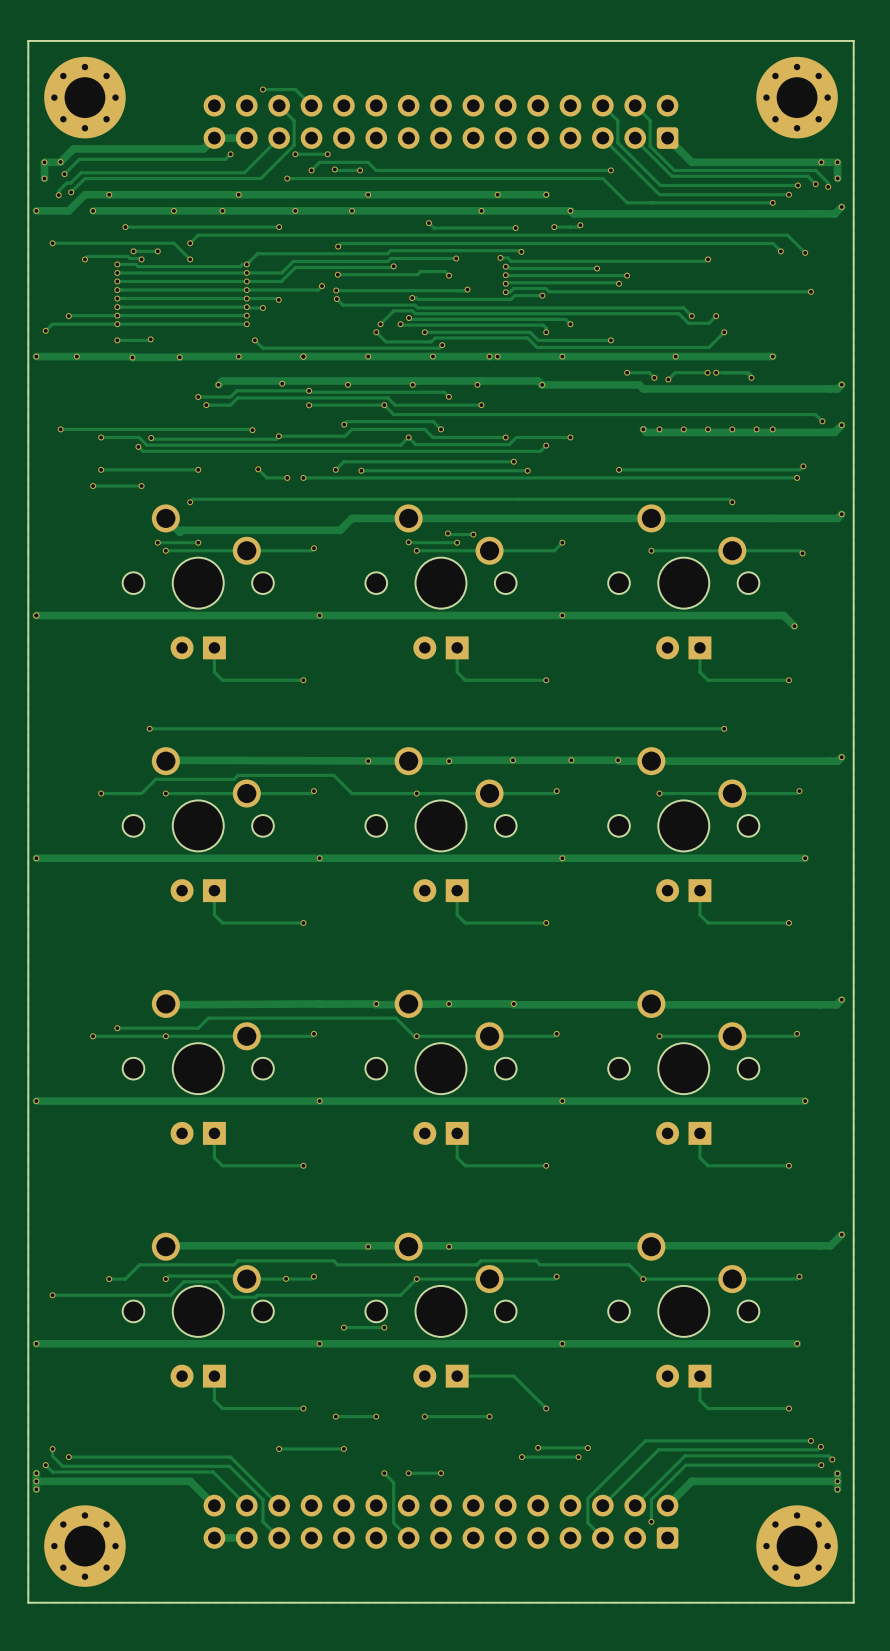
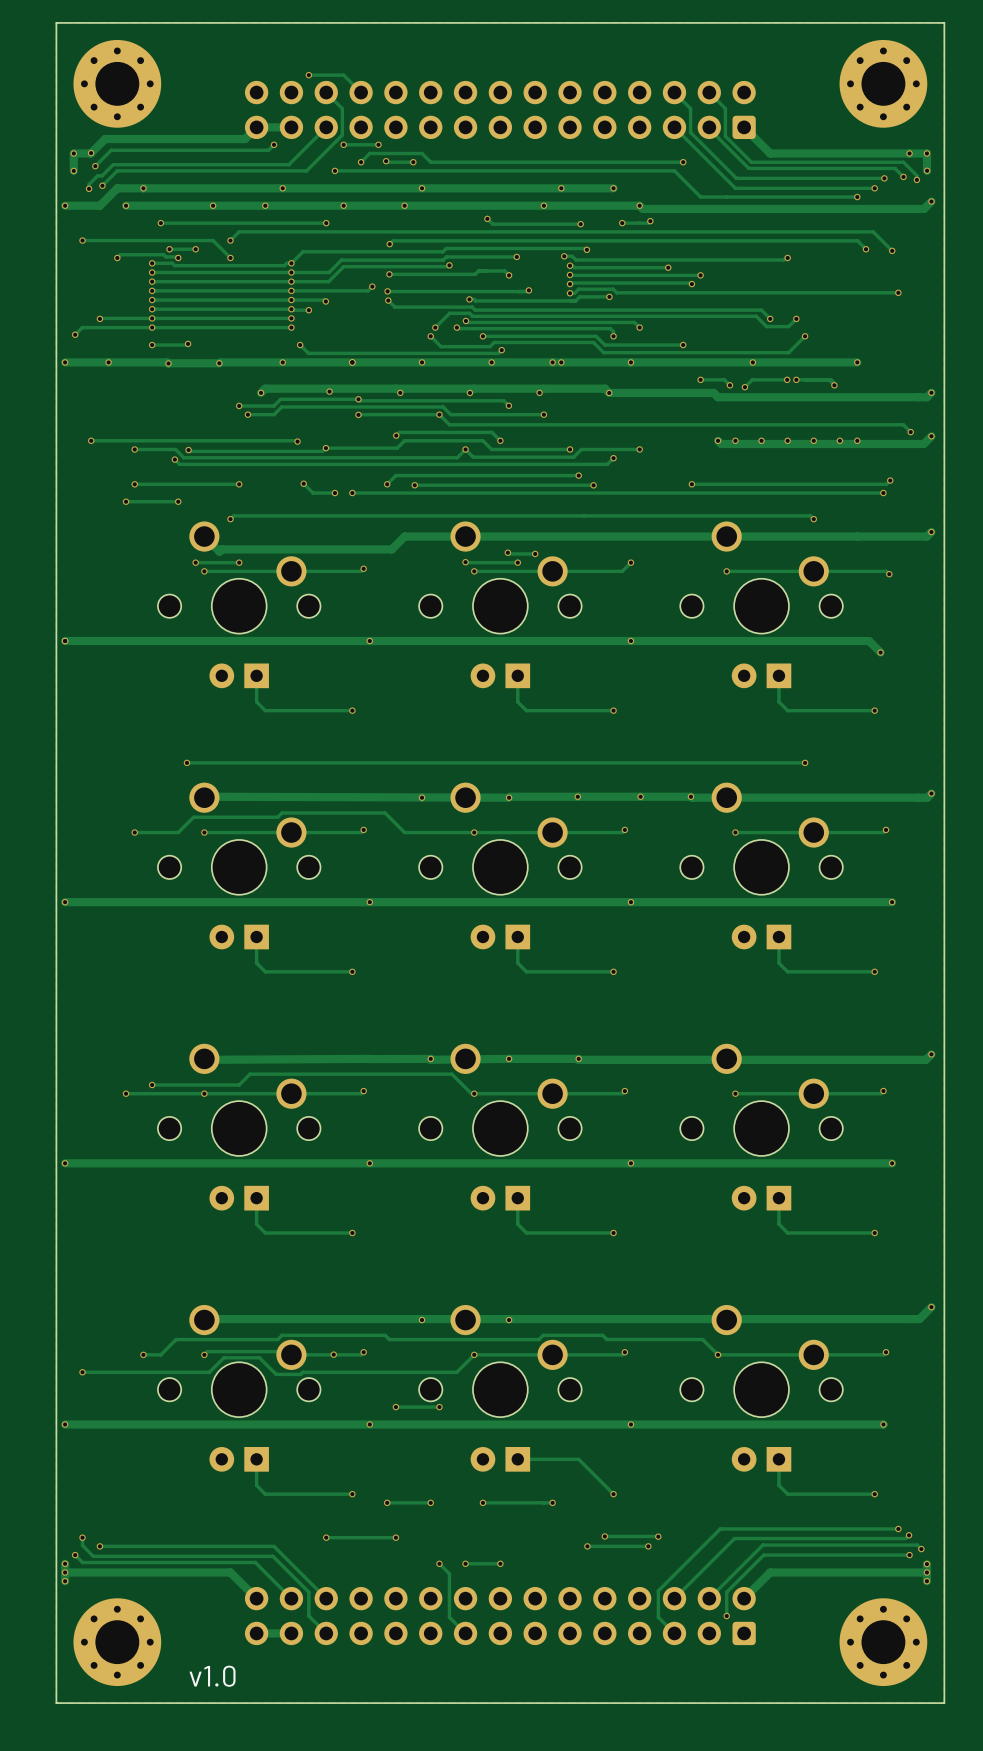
text: none -> v1.0 (212, 1676)

